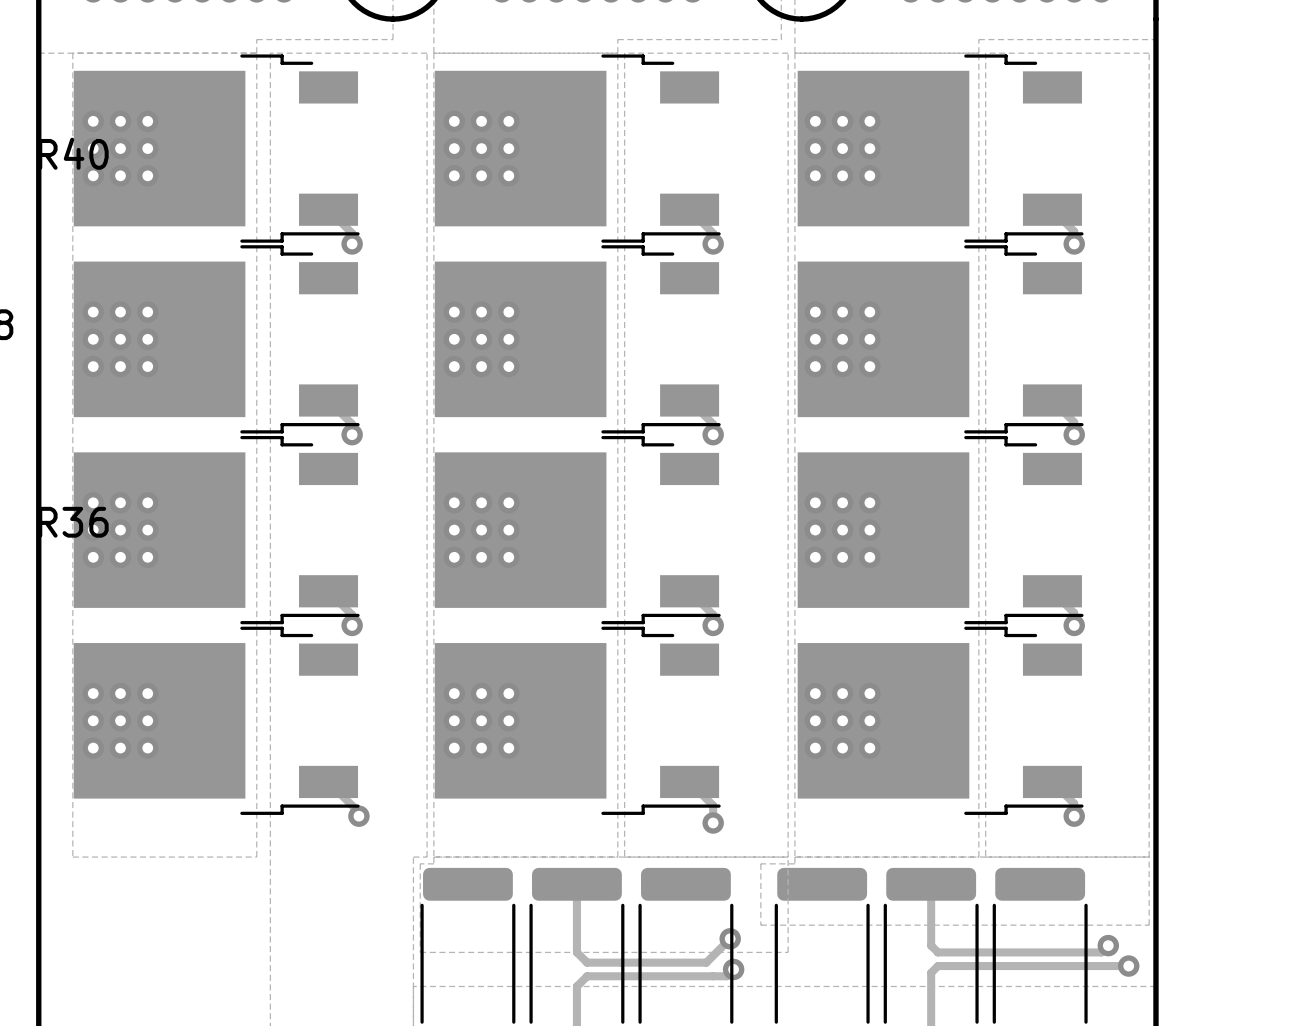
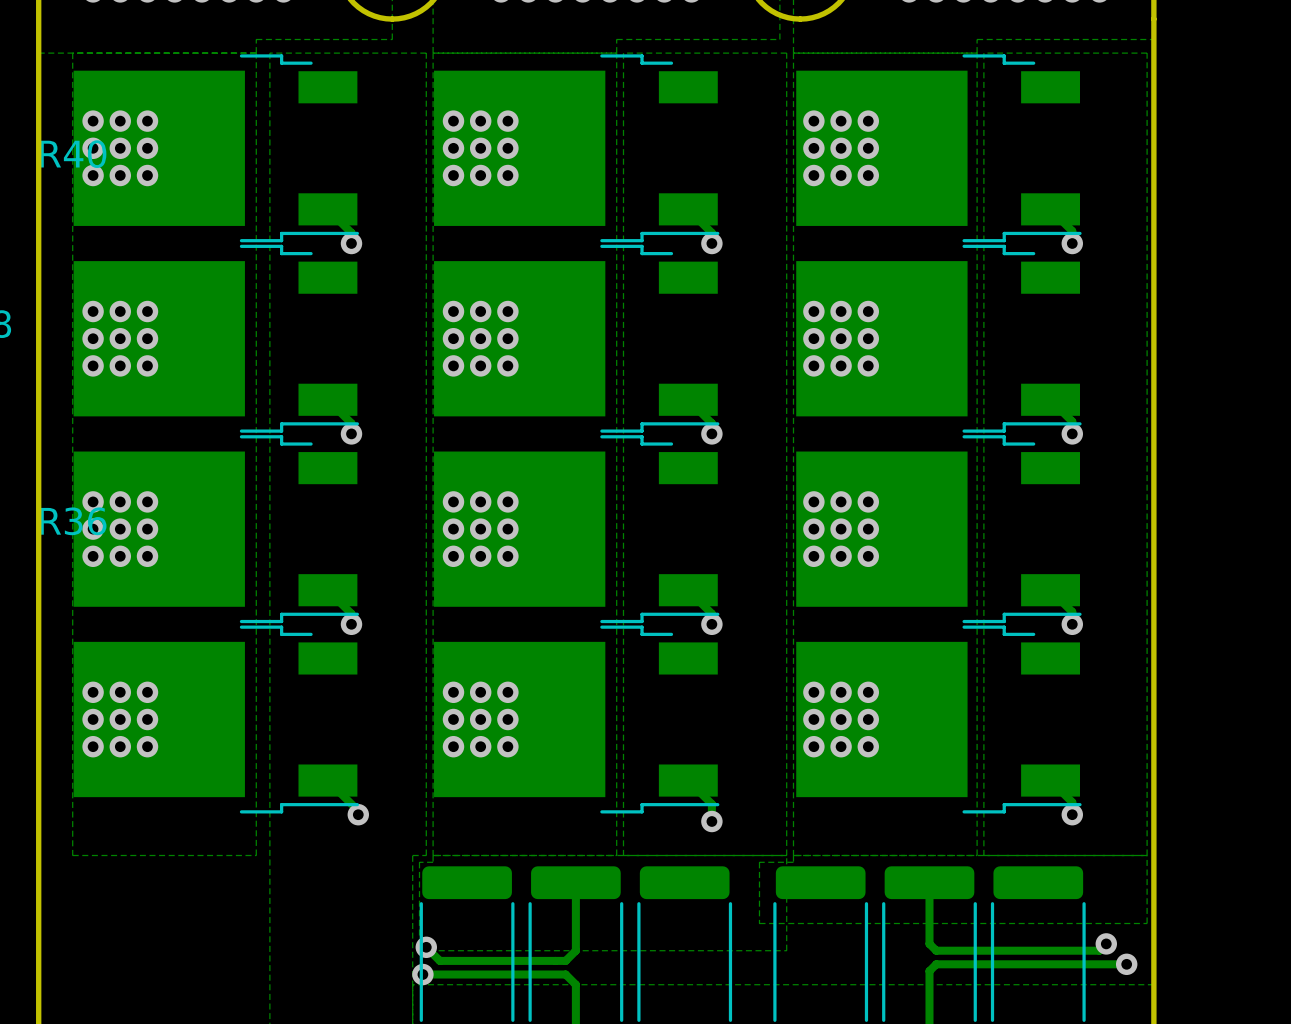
track: (730, 938) (706, 962) (587, 962) (576, 952) -> (426, 947) (439, 960) (565, 960) (575, 950)
via: (730, 938) -> none
via: none -> (426, 947)
track: (733, 969) (726, 976) (587, 976) (576, 986) -> (422, 974) (565, 974) (575, 984)
via: (733, 969) -> none
via: none -> (422, 974)

